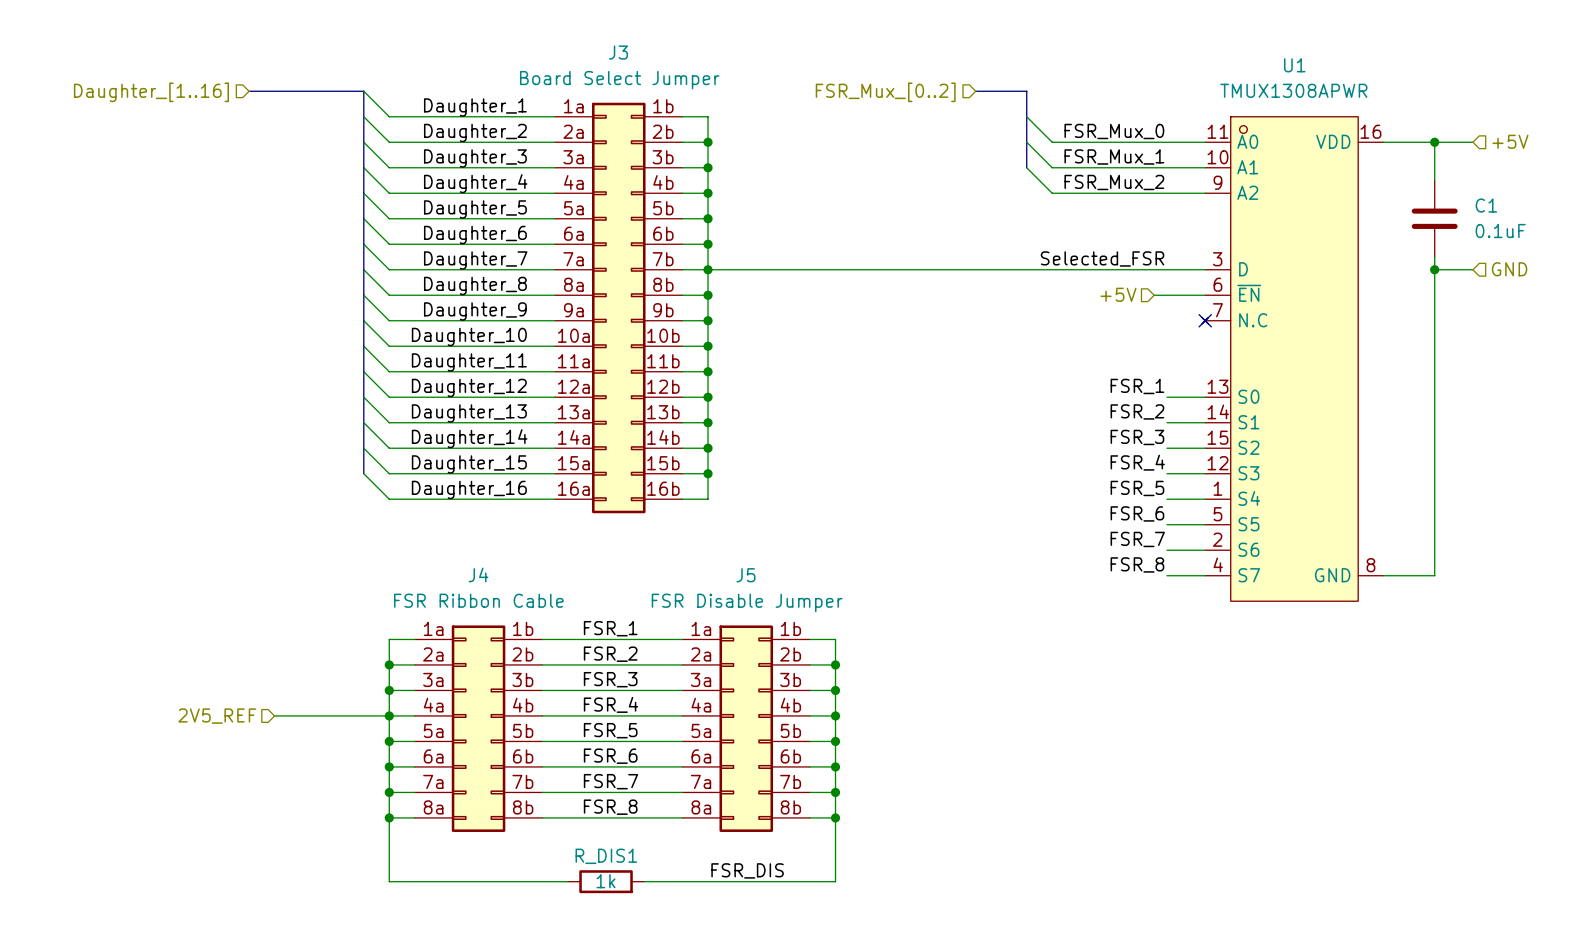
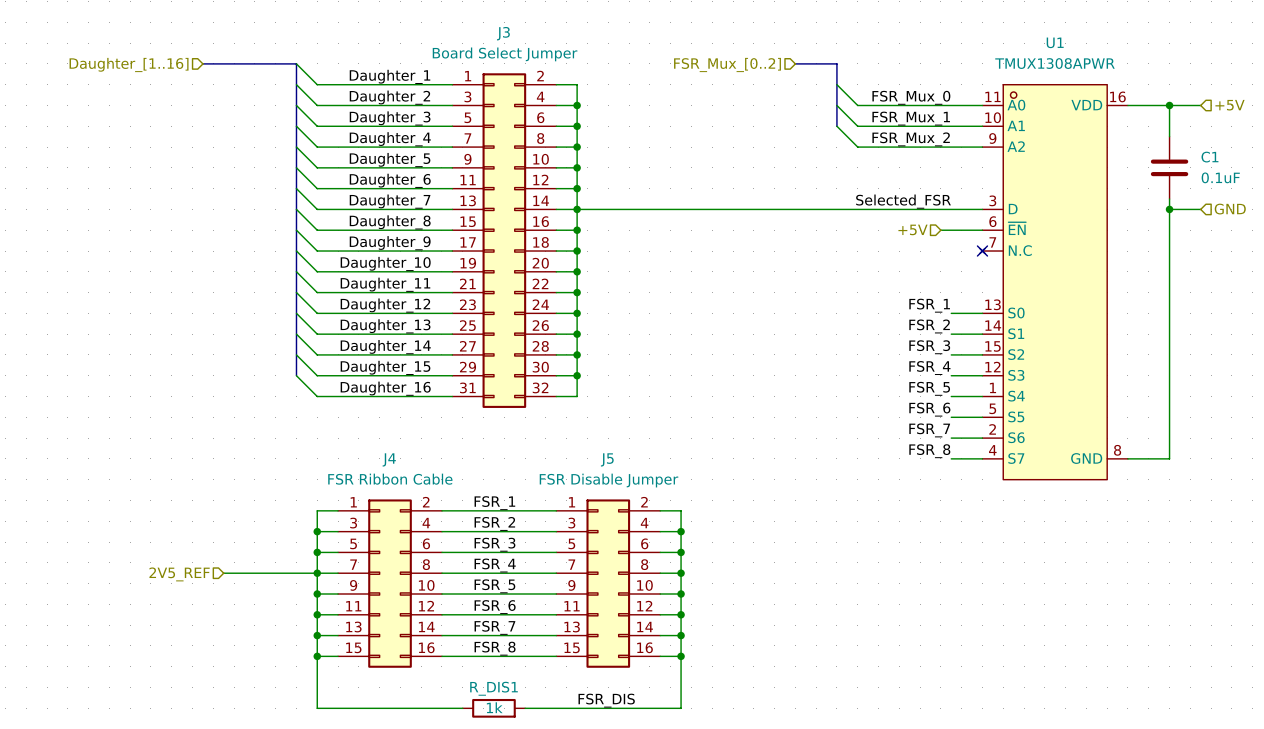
J3 symbol: [555, 102, 683, 514] -> [452, 73, 557, 408]
J4 symbol: [414, 625, 543, 832] -> [338, 499, 442, 668]
J5 symbol: [682, 625, 811, 832] -> [556, 499, 661, 668]

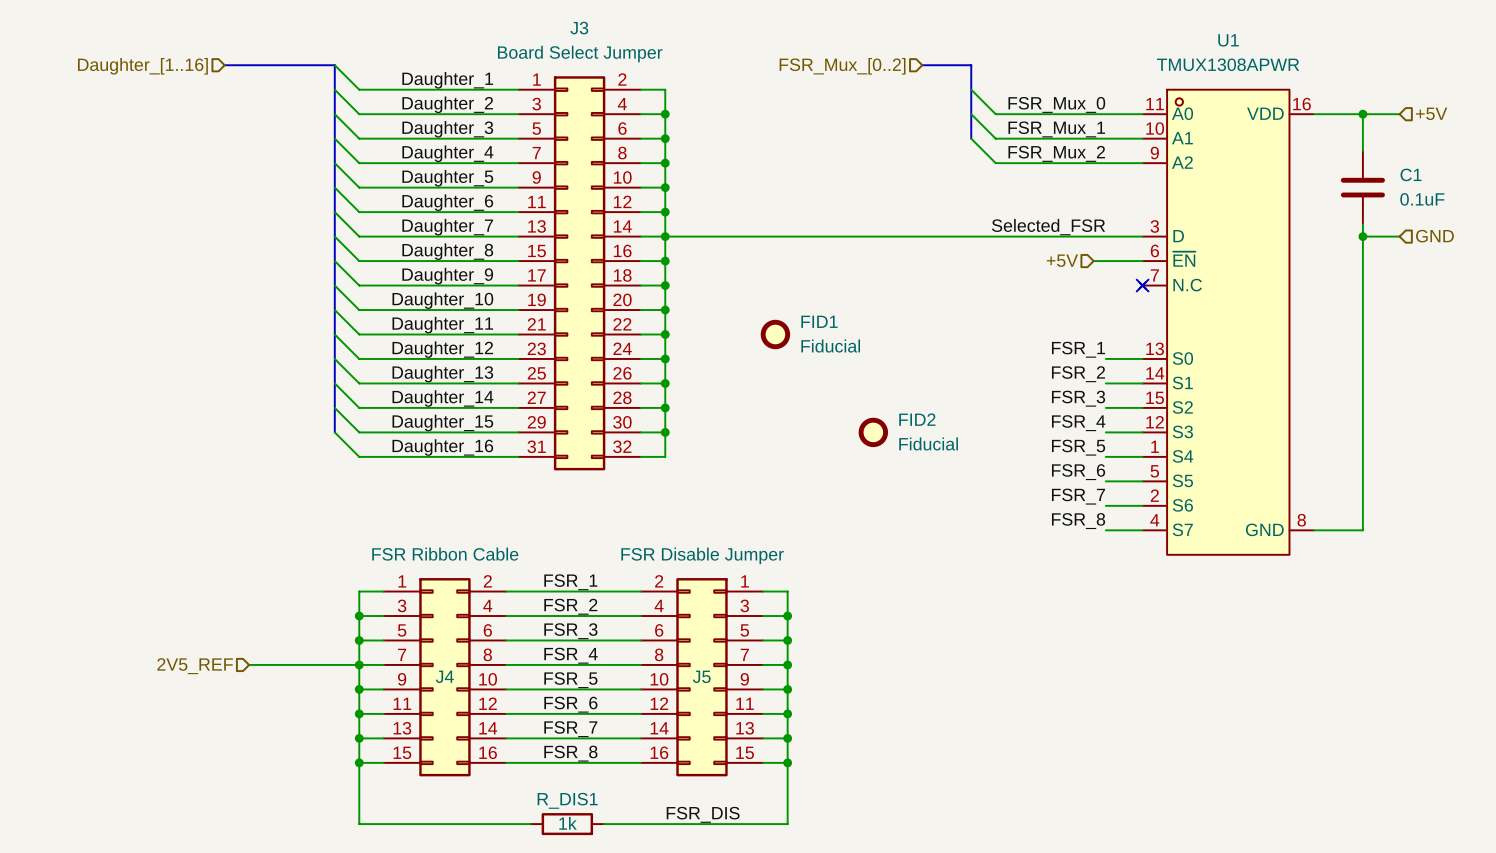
FID1: none -> Fiducial (775, 334)
FID2: none -> Fiducial (873, 432)
J4 name position: J4 (389, 459) -> J4 (444, 676)
J5 name position: J5 (607, 459) -> J5 (701, 676)
J5 flip: as is (608, 583) -> left-right (701, 677)

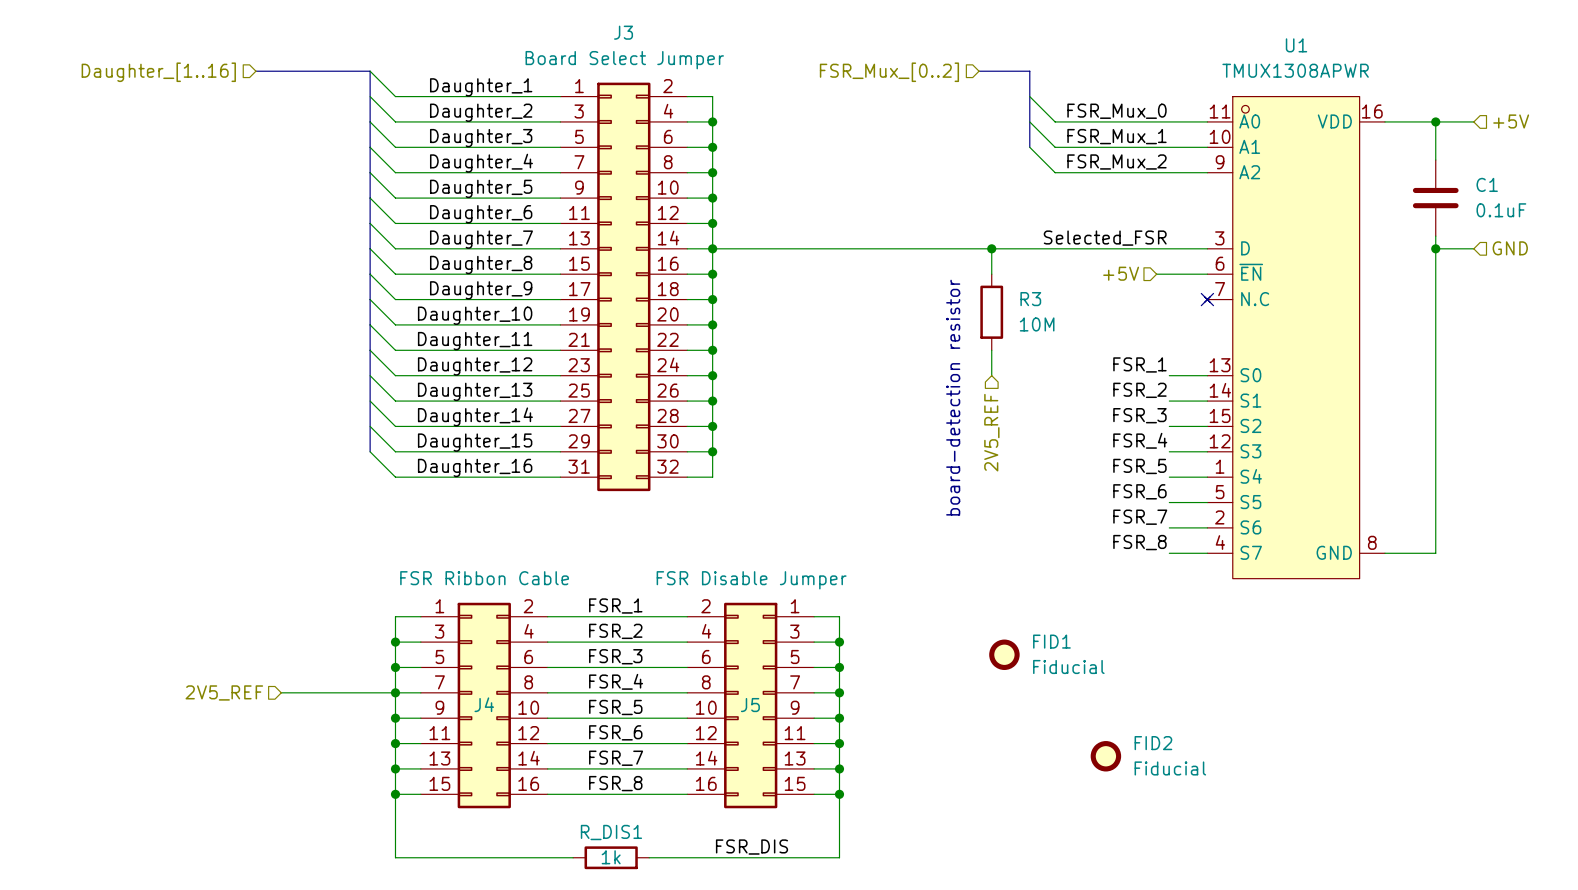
wire: none -> (991, 248) (991, 274)
junction: none -> (991, 248)
R3: none -> 10M (991, 312)
FID1 position: (775, 334) -> (1004, 654)
wire: none -> (991, 350) (991, 375)
text: none -> board-detection resistor (953, 397)
hierarchical label: none -> 2V5_REF (991, 432)
FID2 position: (873, 432) -> (1105, 756)

